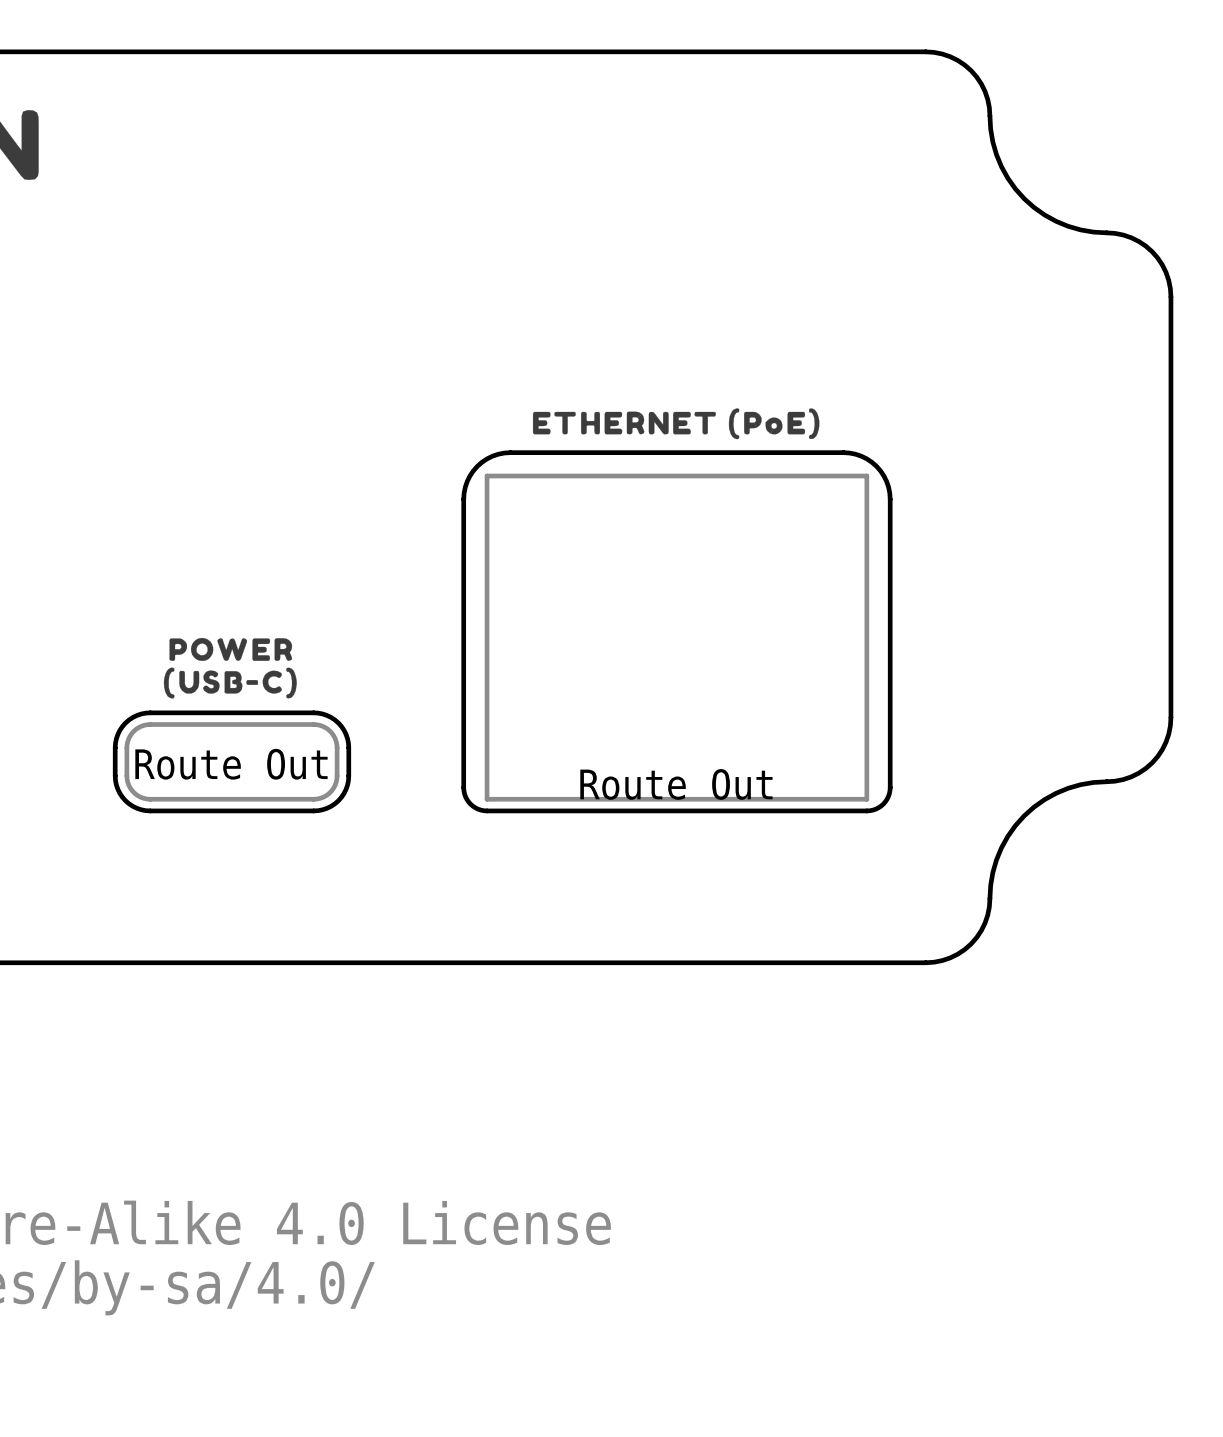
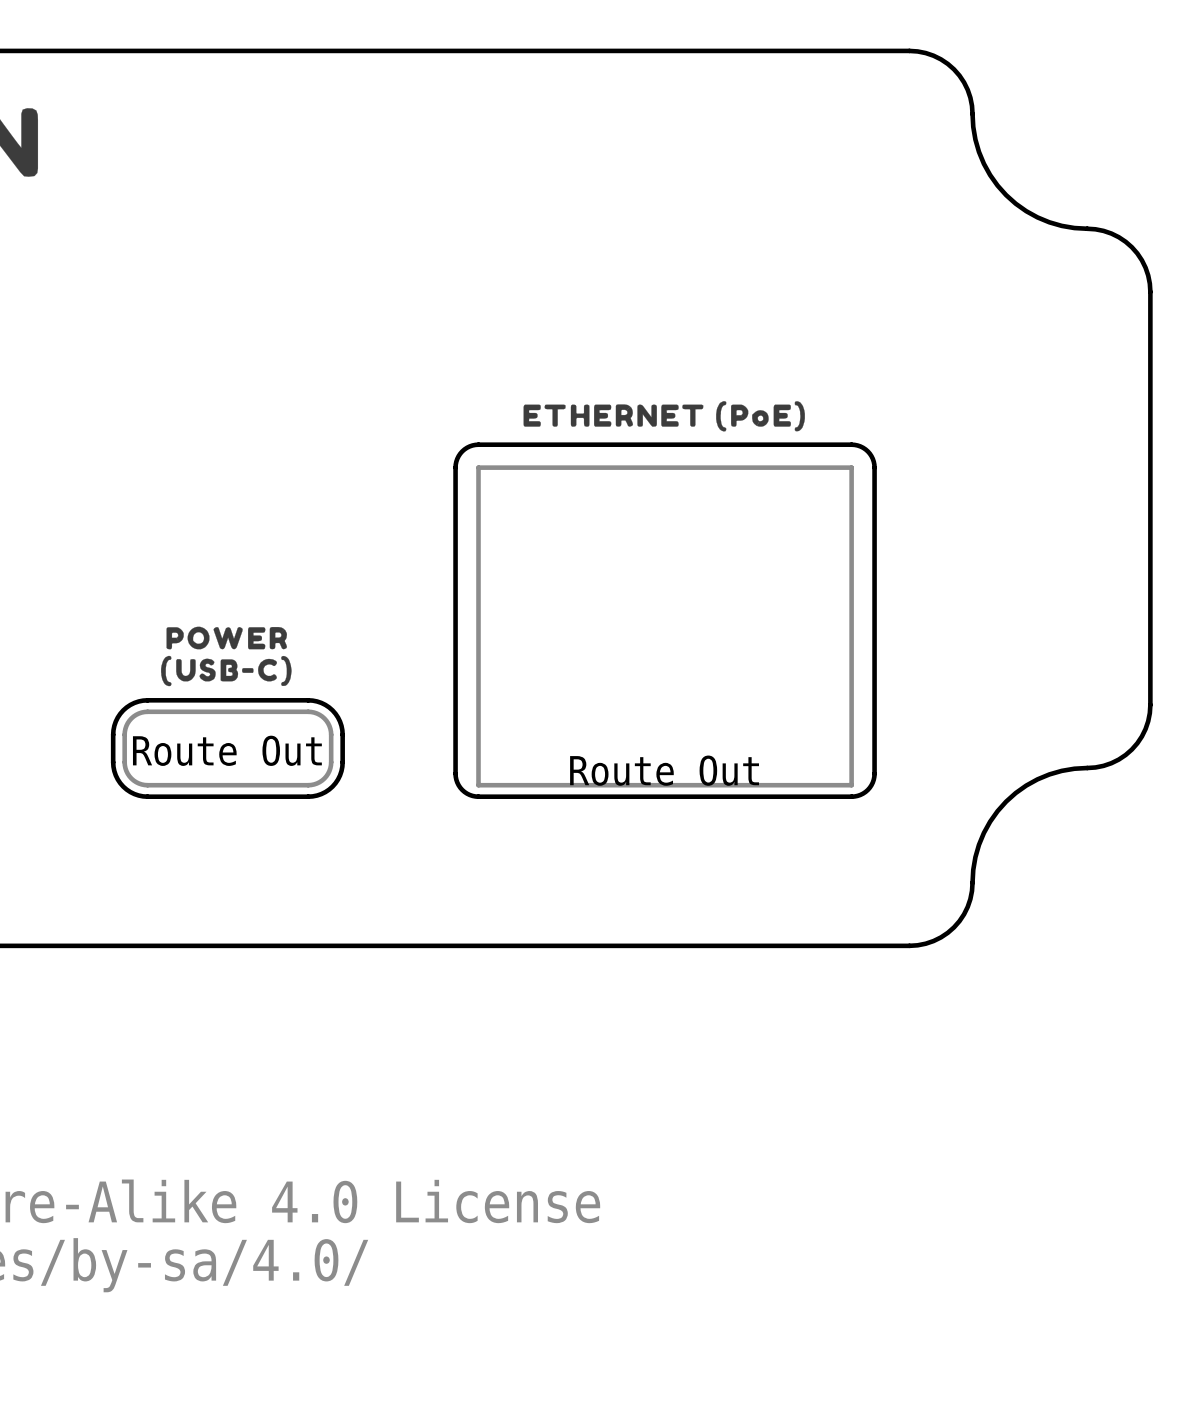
drawing shape: [461, 450, 893, 814] -> [453, 442, 877, 799]

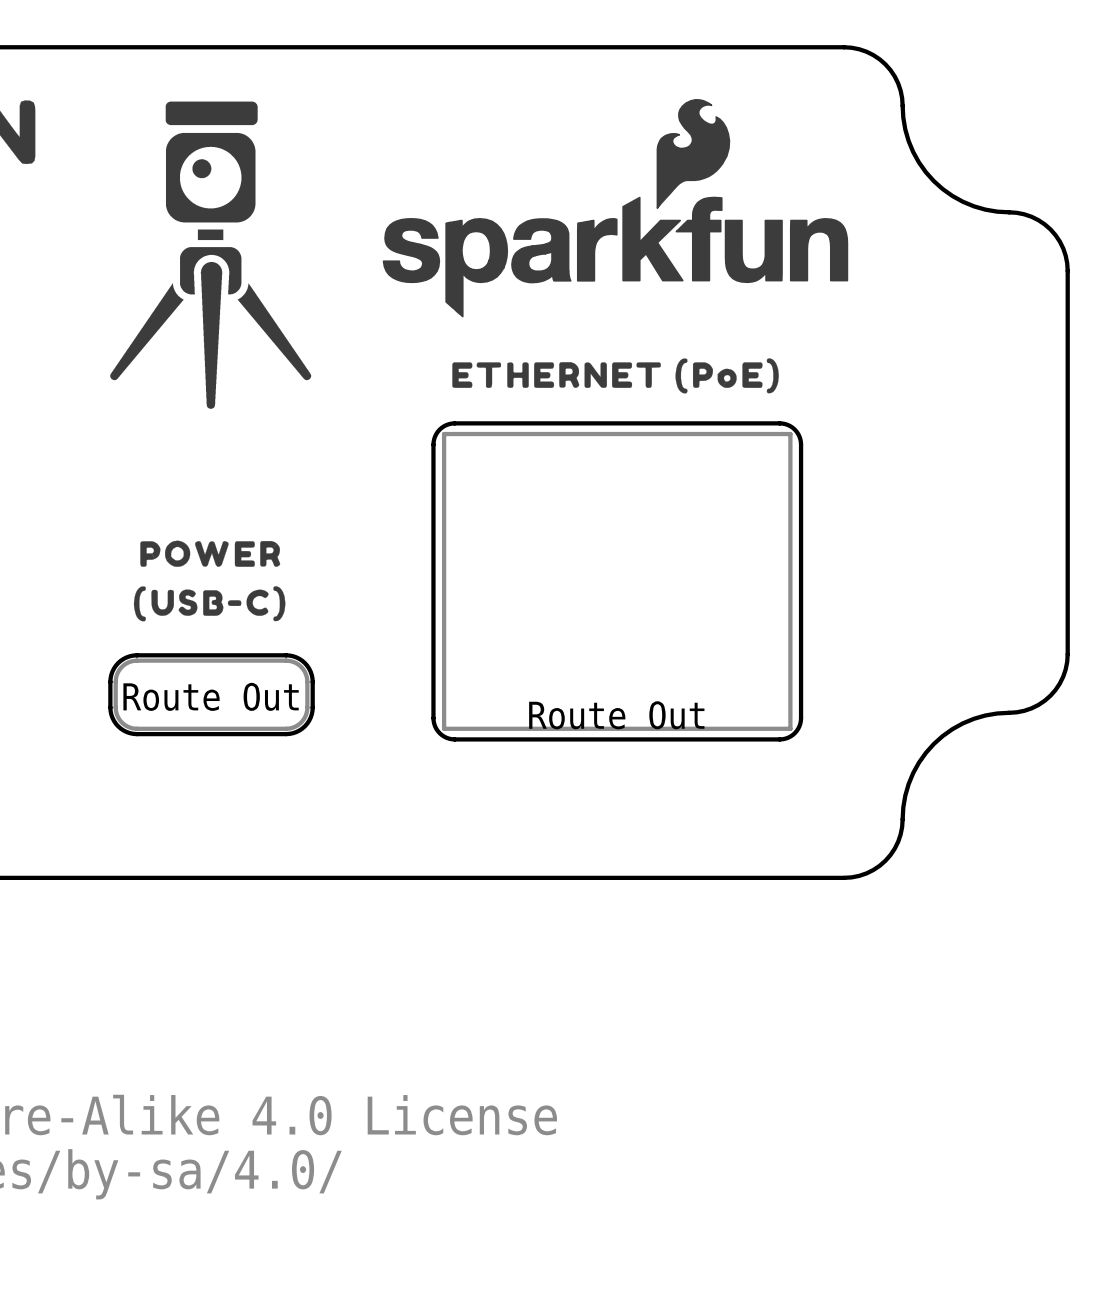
drawing: none -> [382, 98, 849, 318]
drawing: none -> [110, 101, 312, 409]
drawing shape: [523, 401, 805, 432] -> [452, 358, 779, 394]
drawing shape: [453, 442, 877, 799] -> [431, 421, 804, 742]
drawing: none -> [133, 540, 286, 622]
drawing: [161, 626, 292, 687] -> none
drawing shape: [110, 698, 345, 799] -> [108, 653, 315, 737]

